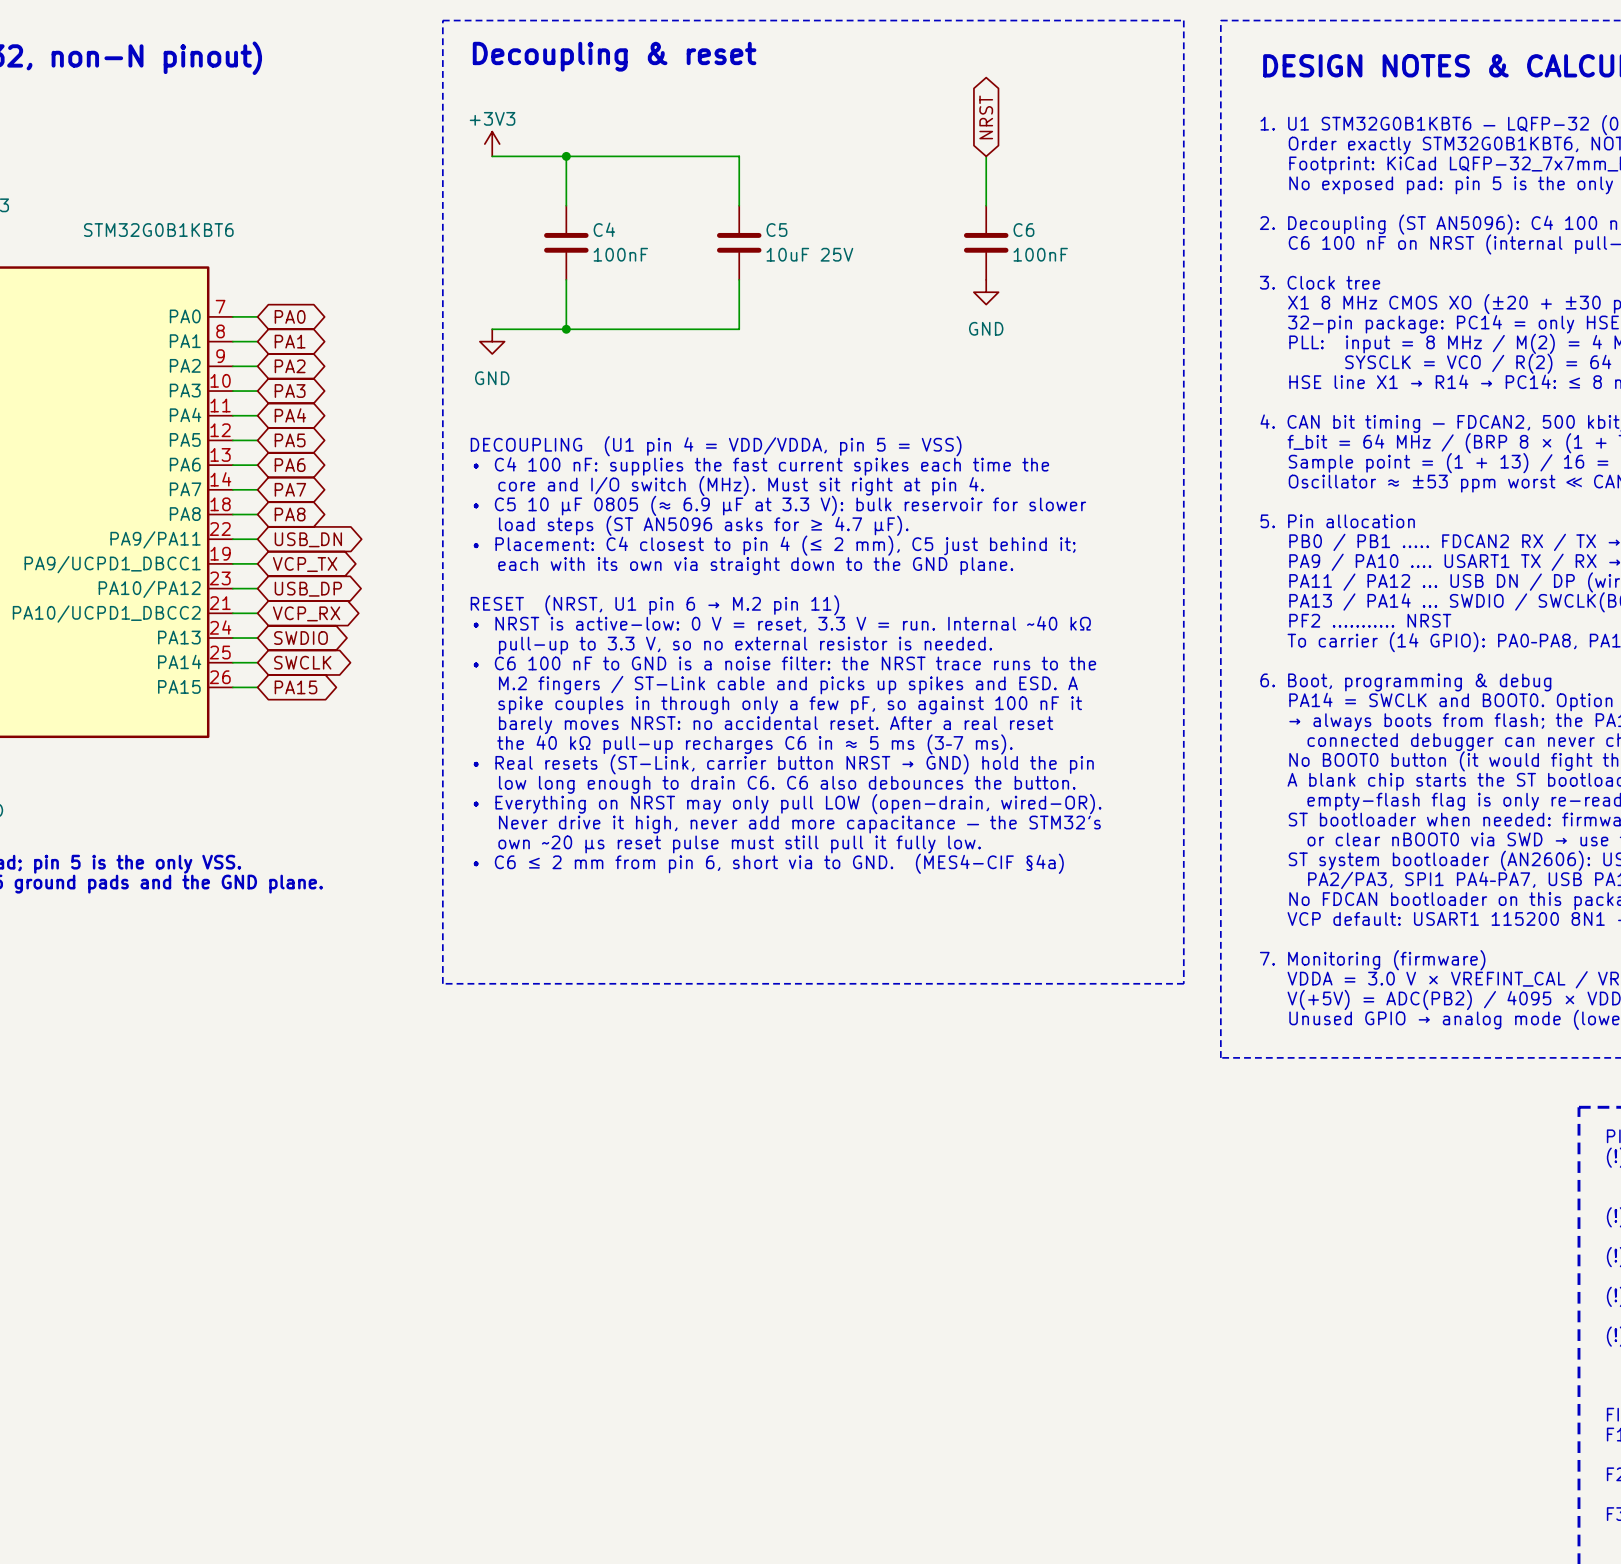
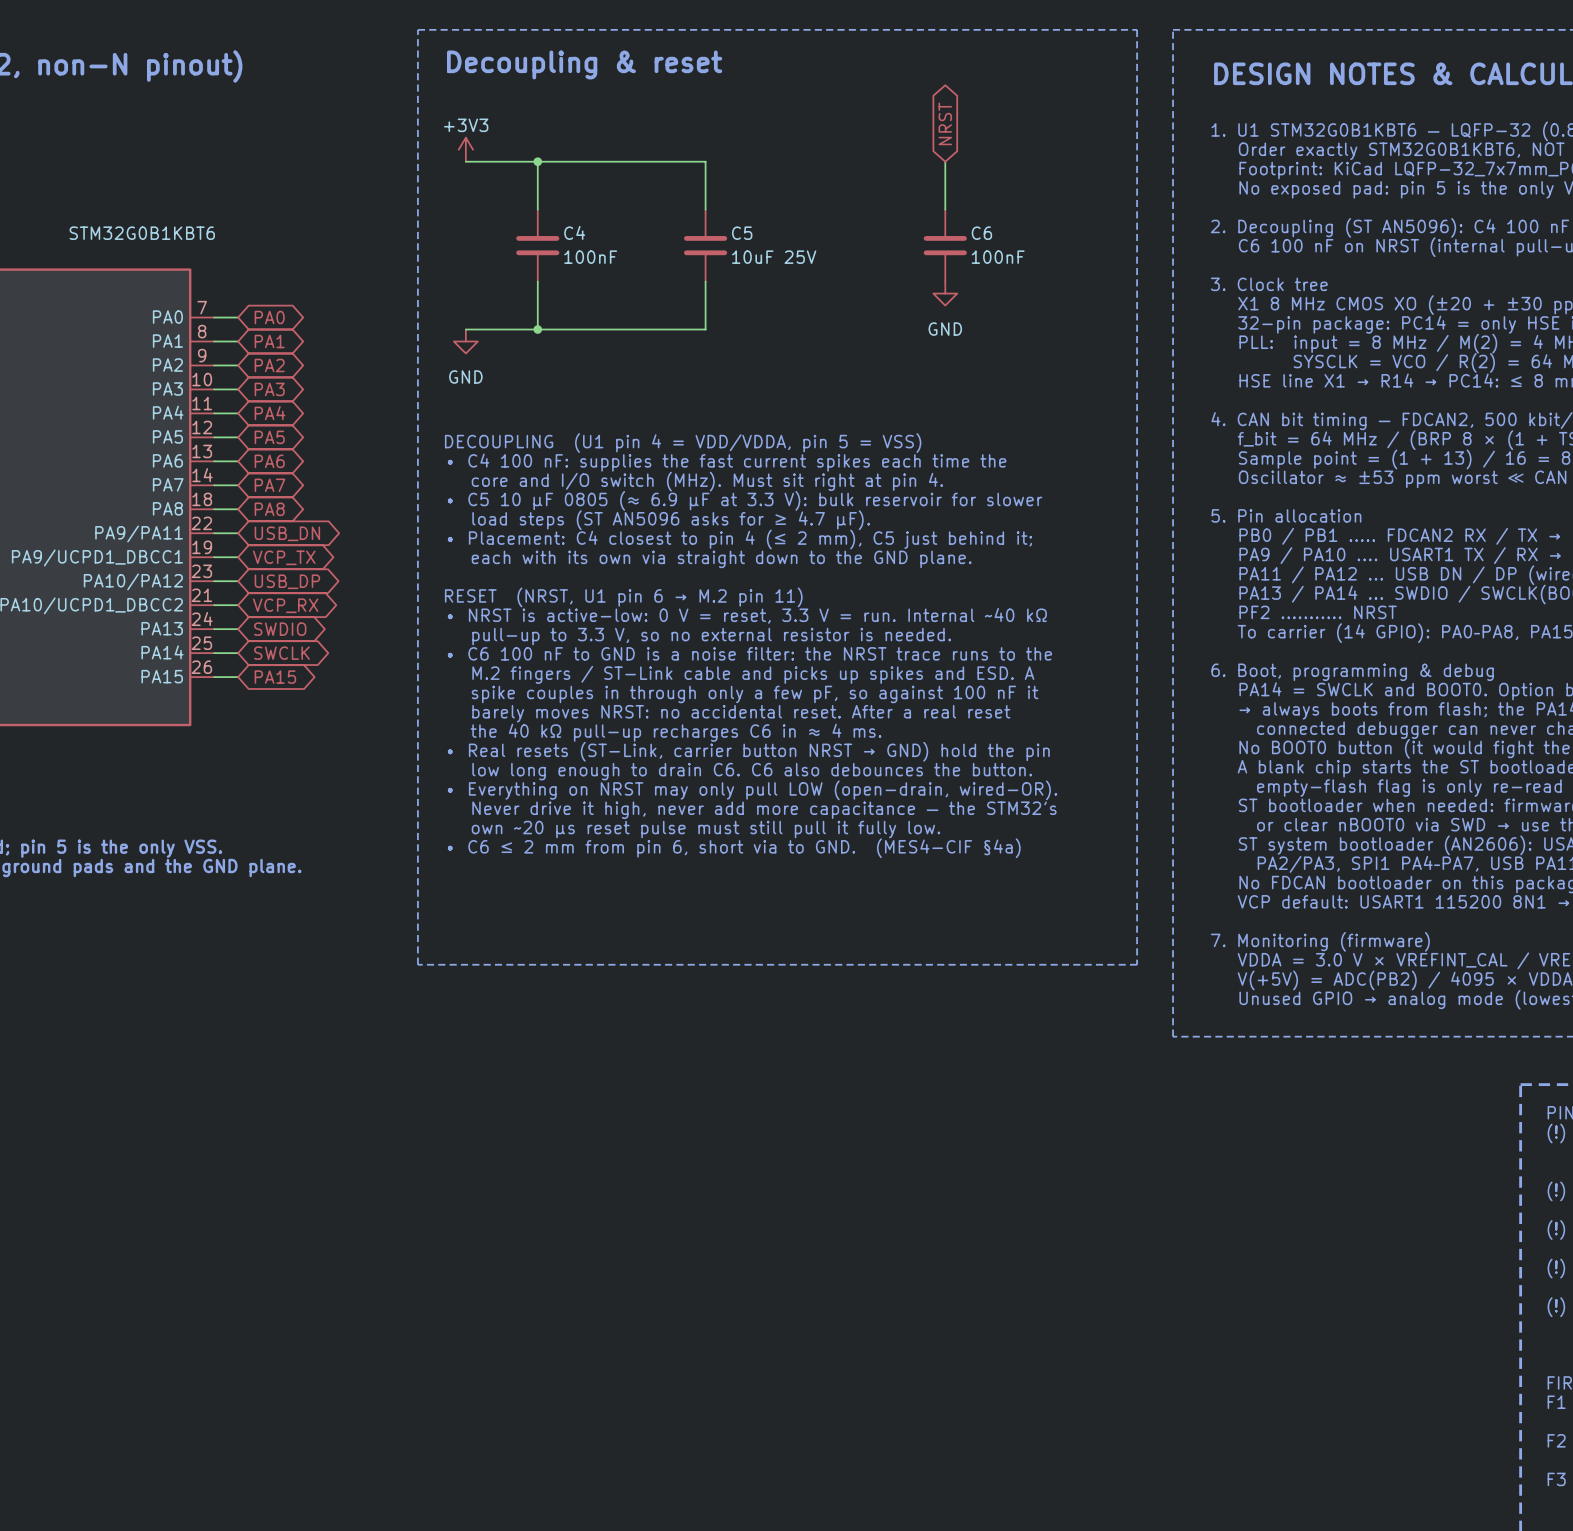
text: the 40 kΩ pull-up recharges C6 in ≈ 5 ms (3–7 ms). (754, 744) -> the 40 kΩ pull-up recharges C6 in ≈ 4 ms. (675, 732)

